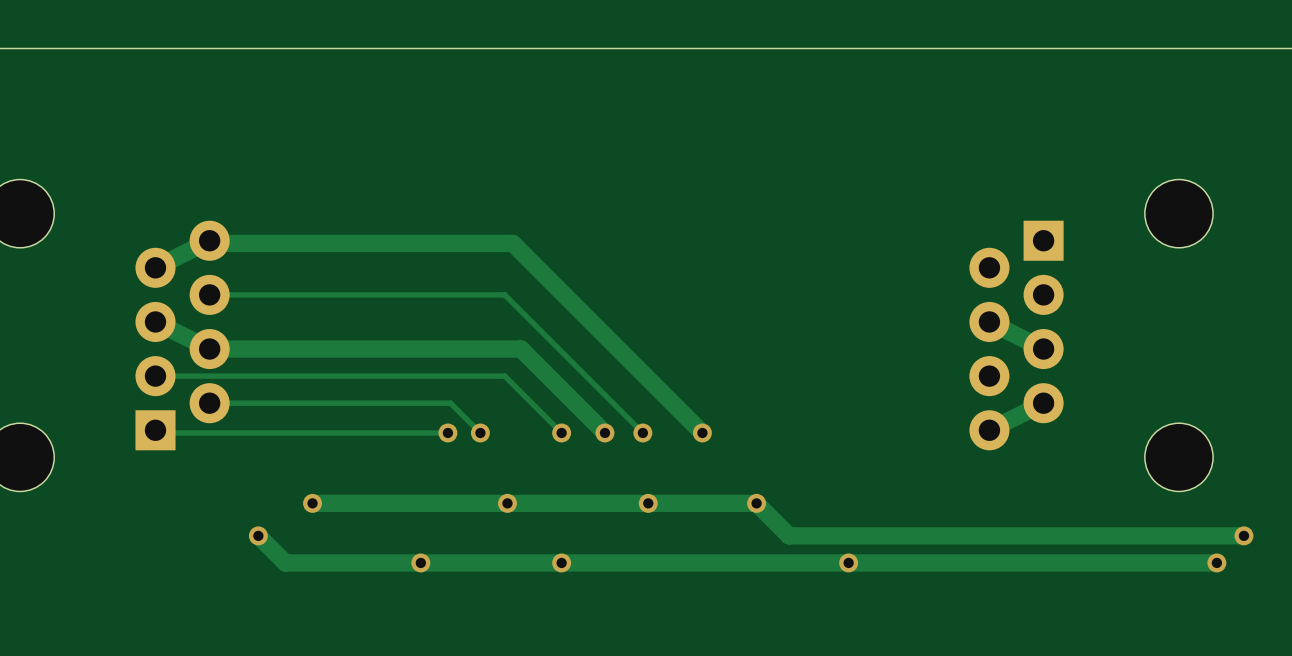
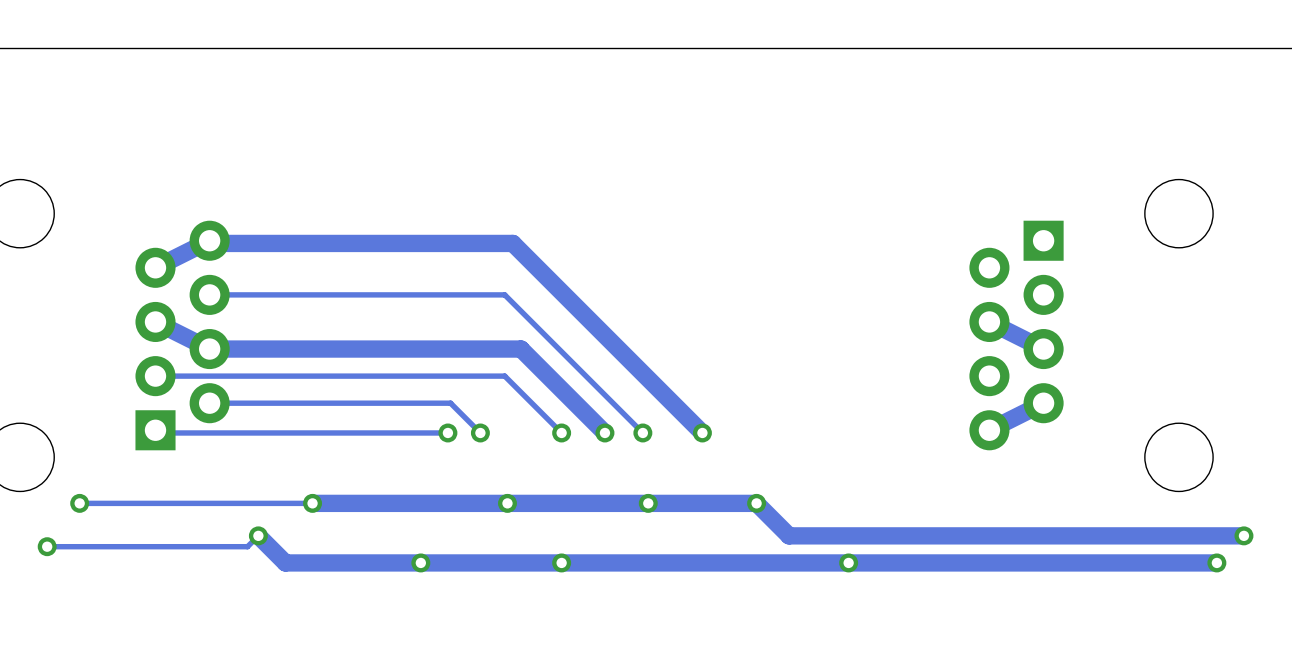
via: none -> (79, 503)
track: none -> (312, 503) (79, 503)
track: none -> (258, 535) (247, 546) (47, 546)
via: none -> (47, 546)

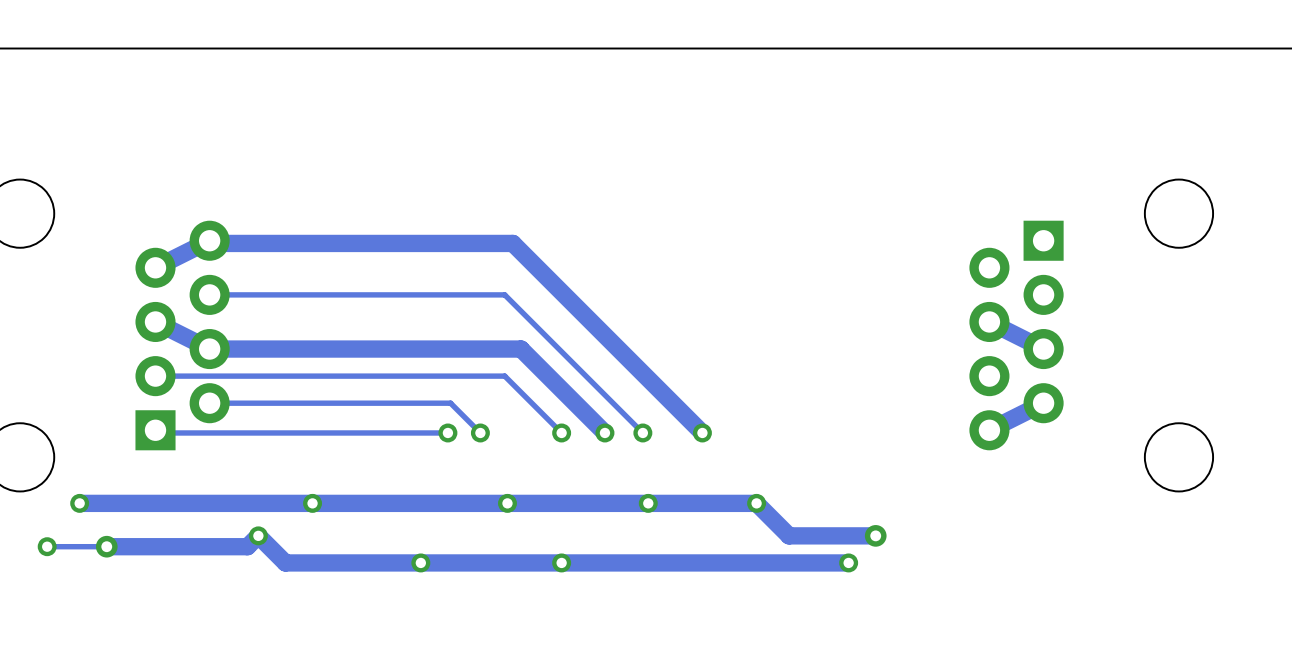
track width: thin (312, 503) (79, 503) -> thick (312, 503) (79, 503)
track width: thin (258, 535) (247, 546) (106, 546) -> thick (258, 535) (247, 546) (106, 546)
via: none -> (875, 535)
track: (1243, 535) (875, 535) -> none
via: (1243, 535) -> none
via: none -> (106, 546)
track: (1216, 562) (848, 562) -> none
via: (1216, 562) -> none

